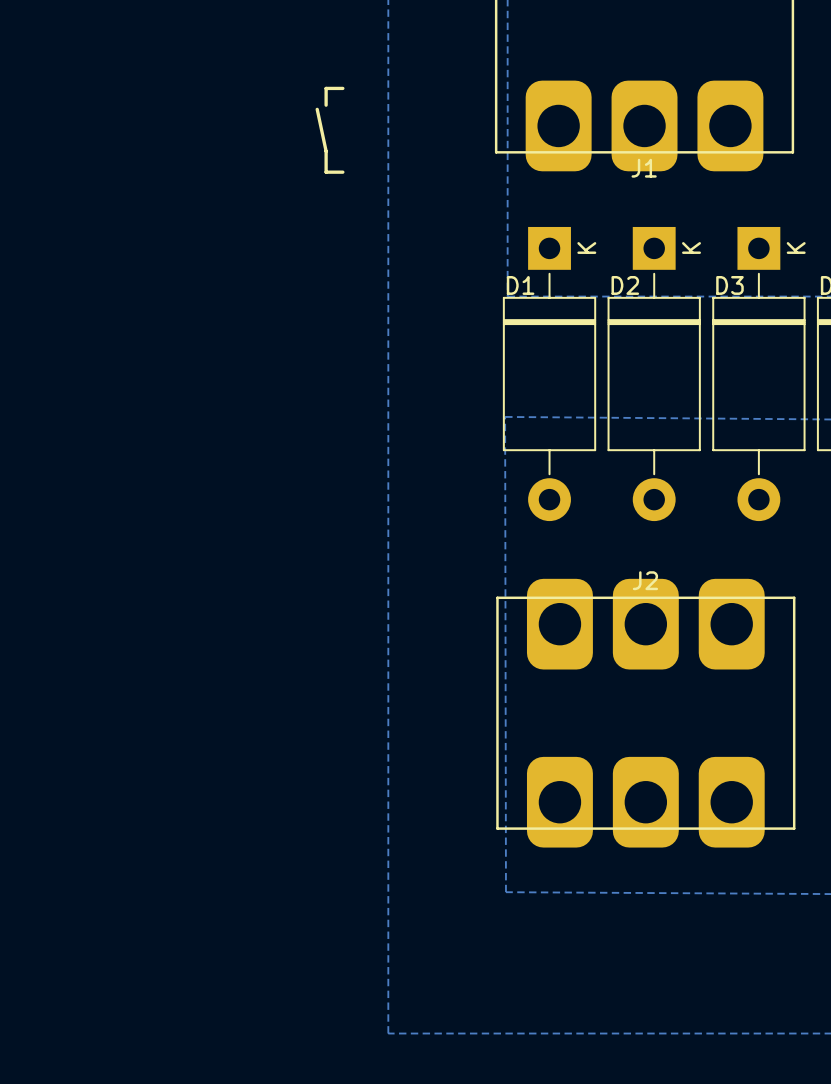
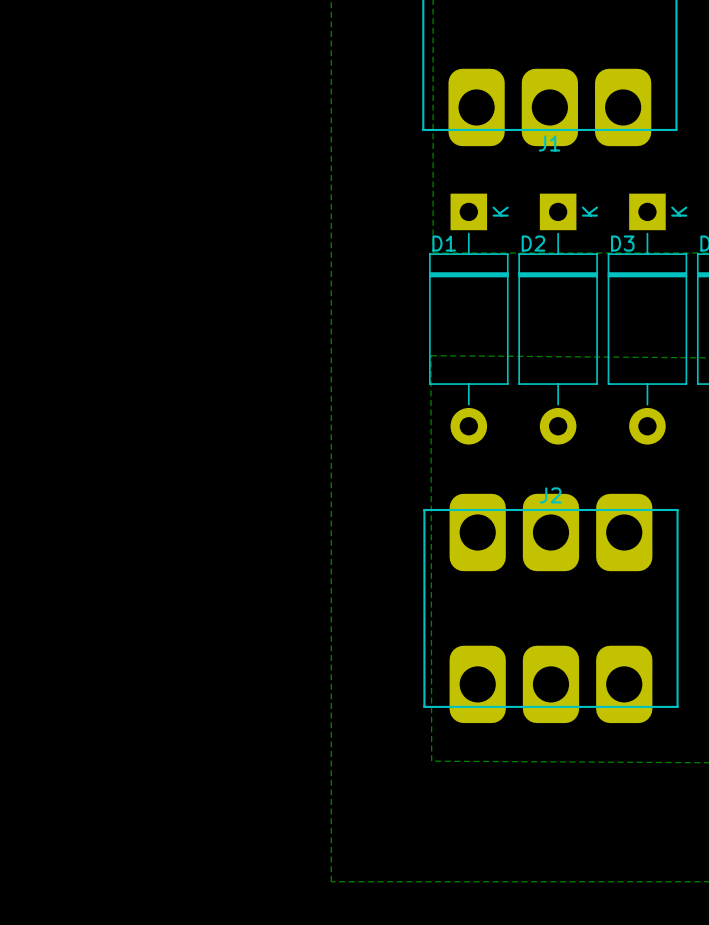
line: (342, 88) (326, 88) (326, 105) -> none
line: (317, 109) (326, 151) (326, 172) (342, 172) -> none

